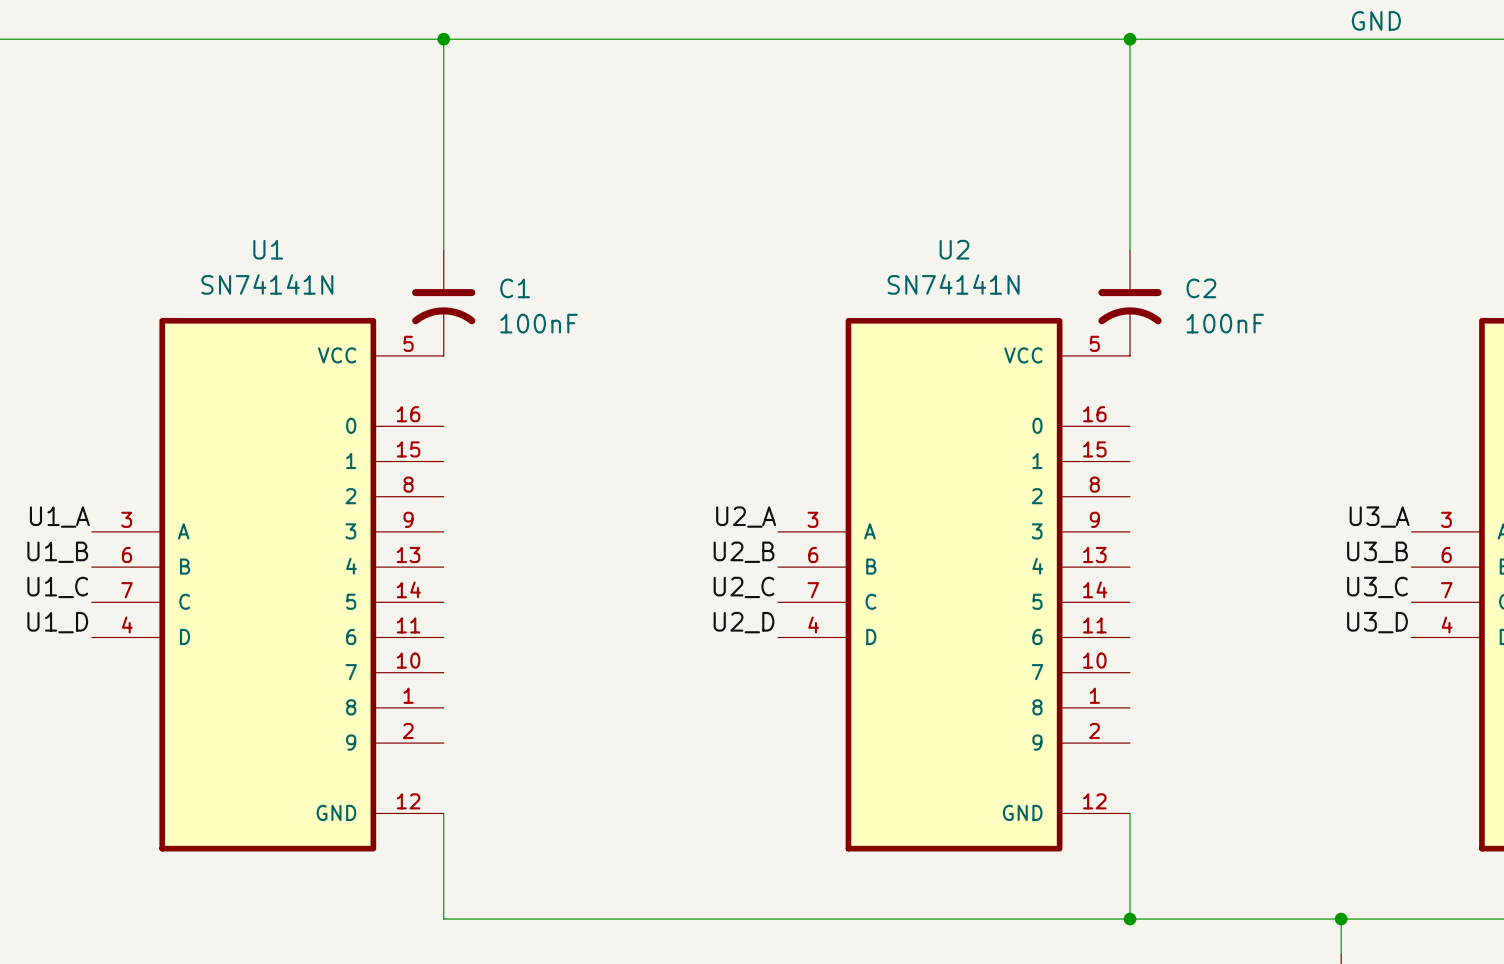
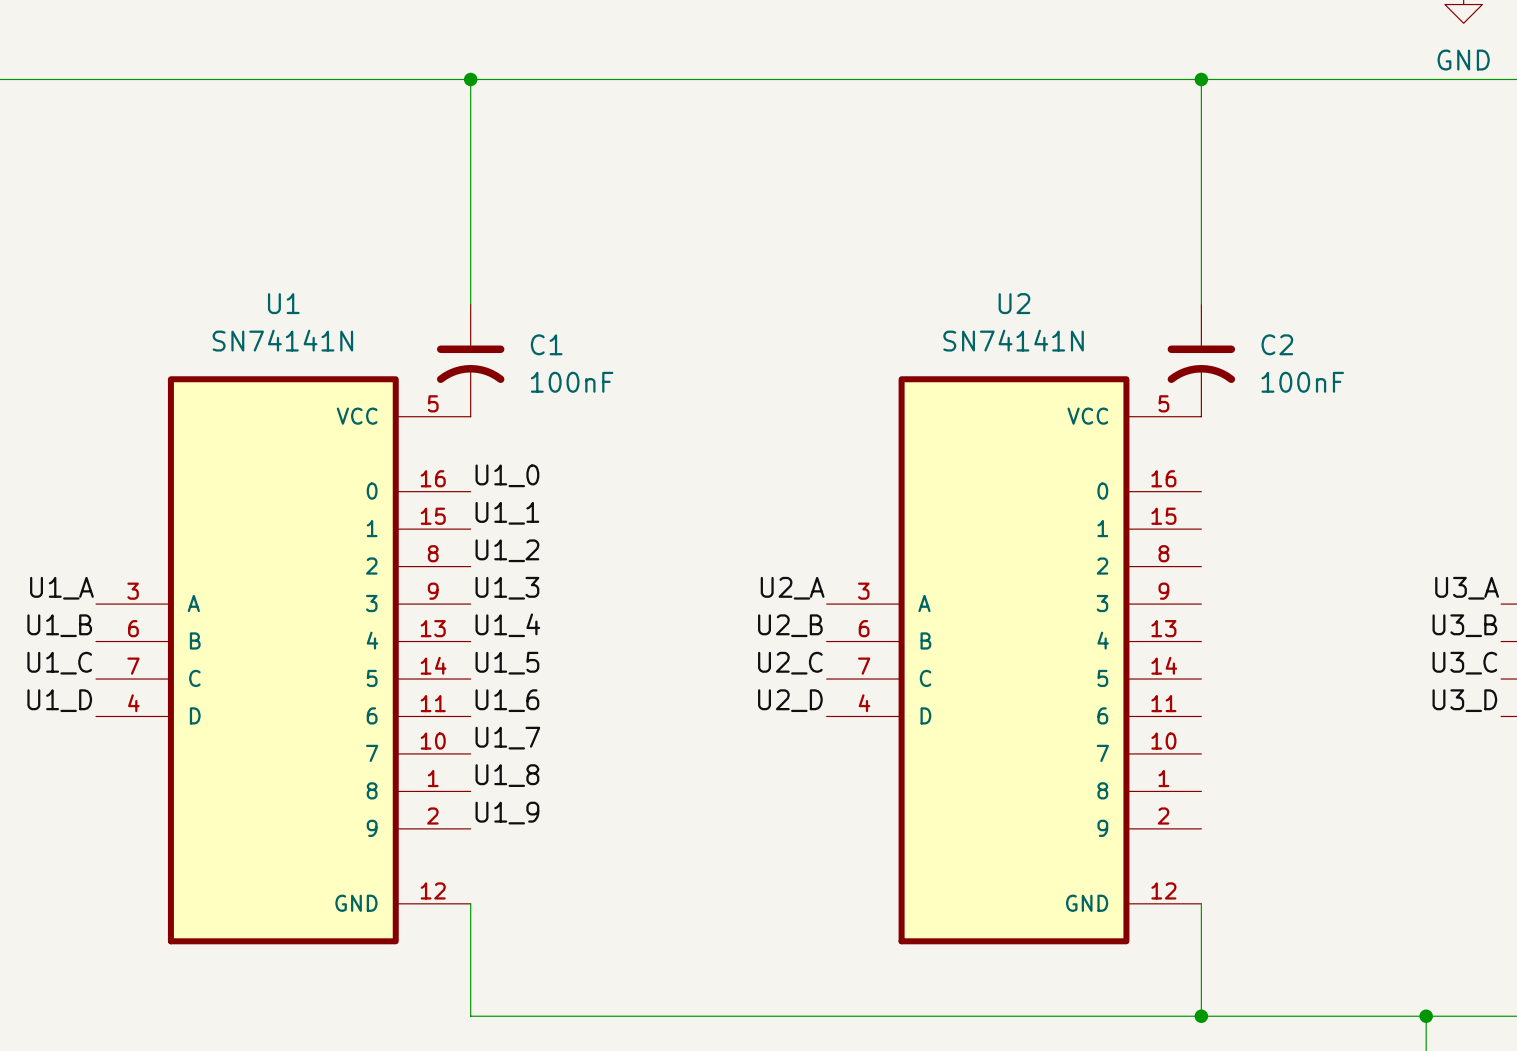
label: none -> U1_0 (507, 475)
label: none -> U1_1 (507, 513)
label: none -> U1_2 (507, 550)
label: none -> U1_3 (507, 588)
label: none -> U1_4 (507, 625)
label: none -> U1_5 (507, 663)
label: none -> U1_6 (507, 700)
label: none -> U1_7 (507, 738)
label: none -> U1_8 (507, 775)
label: none -> U1_9 (507, 813)

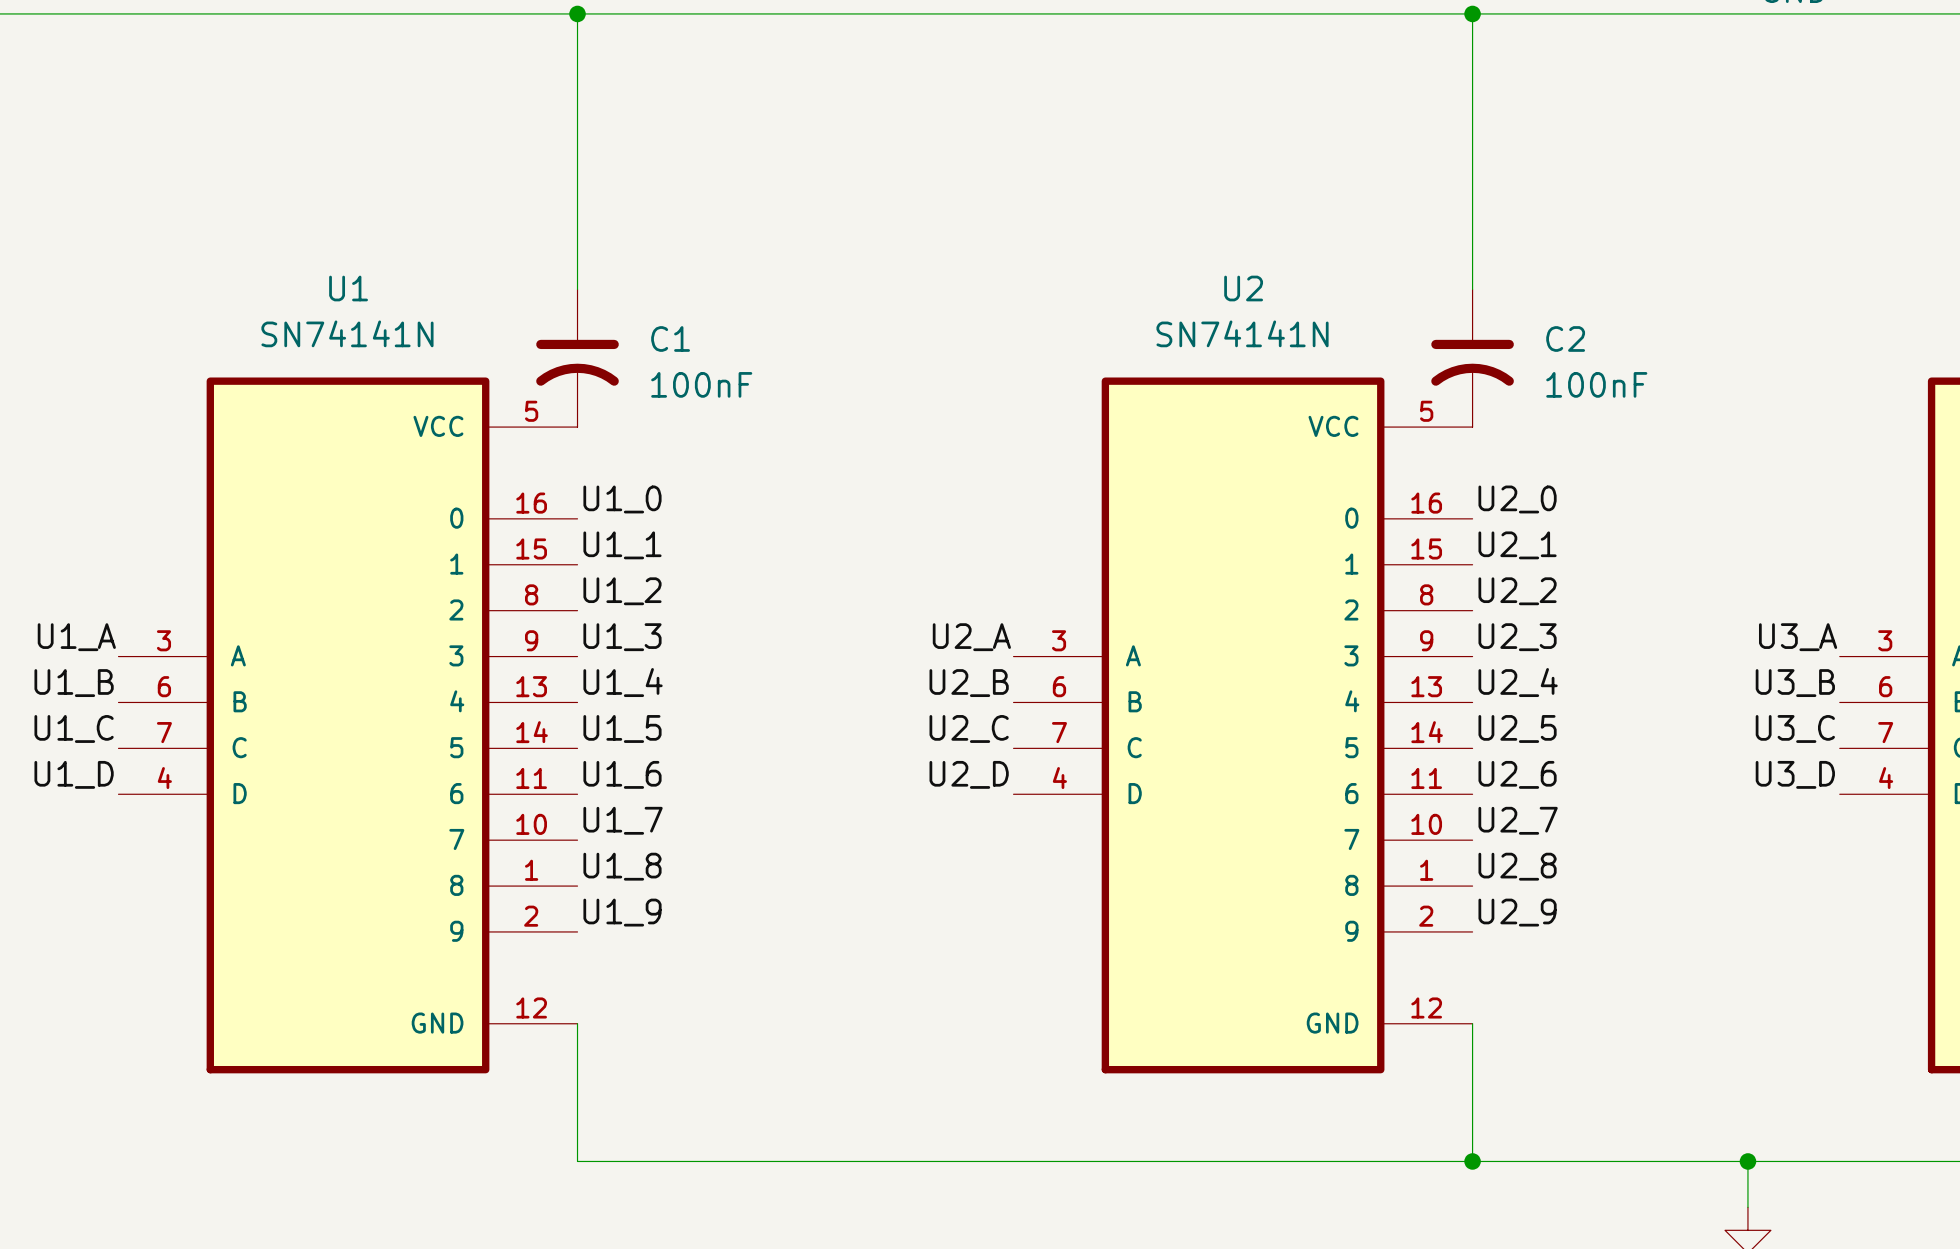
label: none -> U2_0 (1517, 499)
label: none -> U2_1 (1517, 545)
label: none -> U2_2 (1517, 591)
label: none -> U2_3 (1517, 637)
label: none -> U2_4 (1518, 682)
label: none -> U2_5 (1517, 728)
label: none -> U2_6 (1517, 774)
label: none -> U2_7 (1518, 820)
label: none -> U2_8 (1517, 866)
label: none -> U2_9 (1517, 912)

